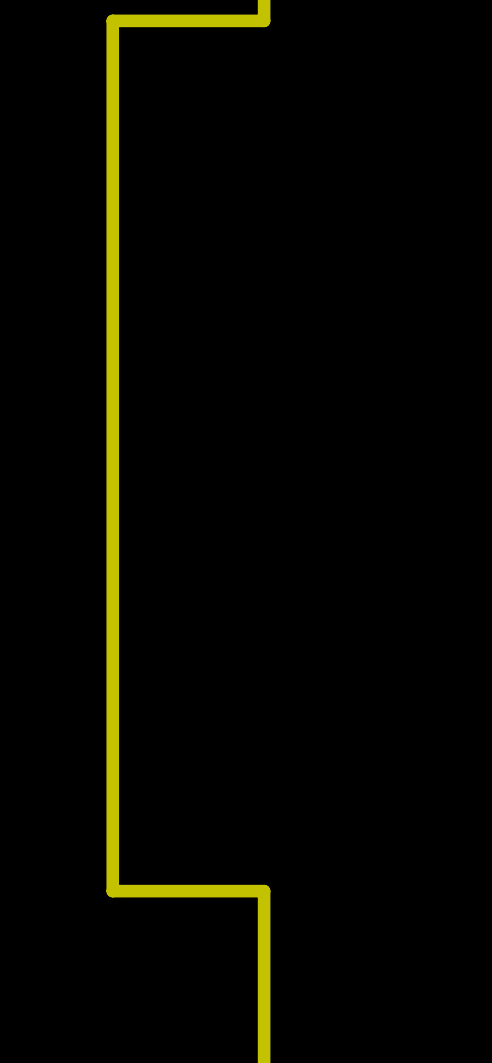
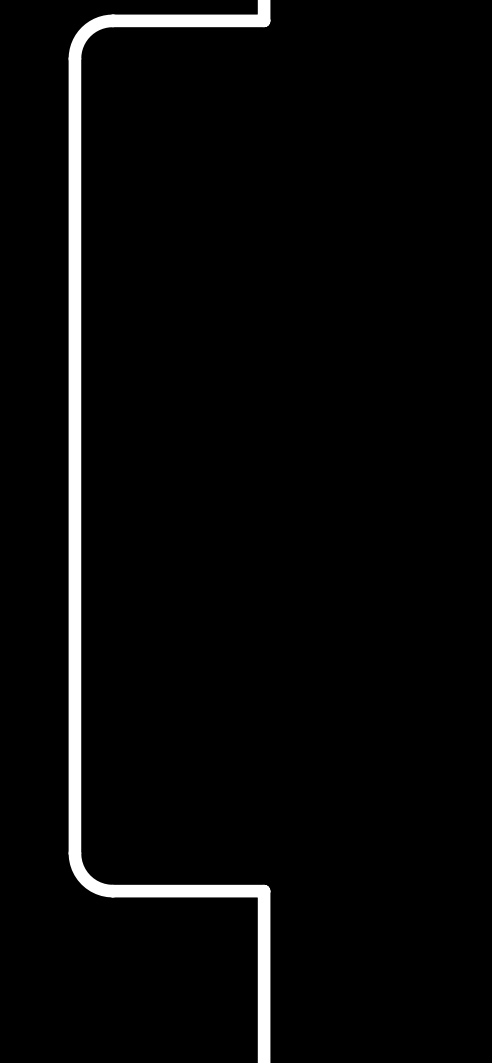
board edge: (112, 20) (112, 891) -> (113, 20) (100, 22) (86, 31) (77, 46) (74, 58) (74, 853) (77, 867) (86, 880) (98, 888) (112, 891)

